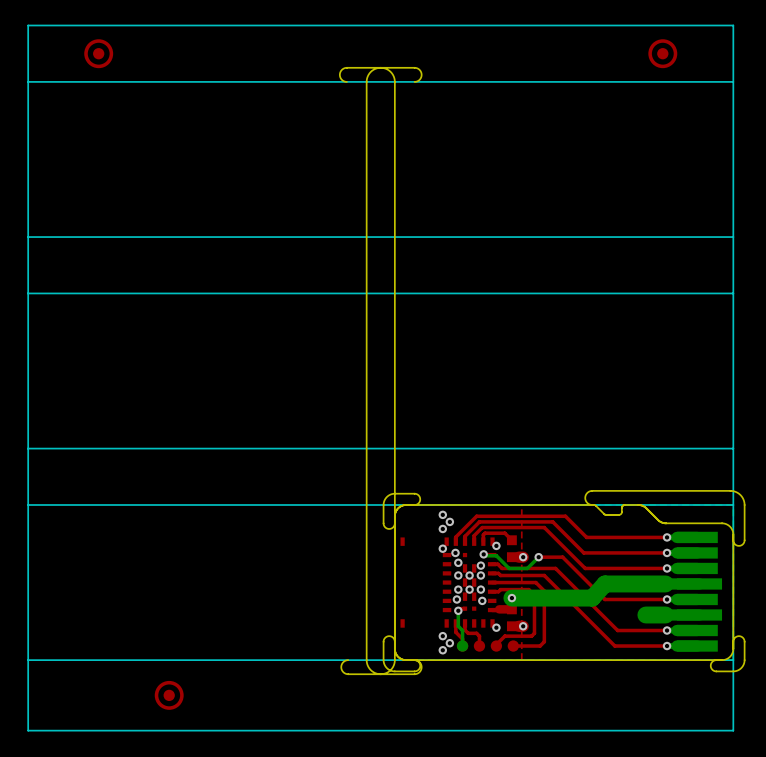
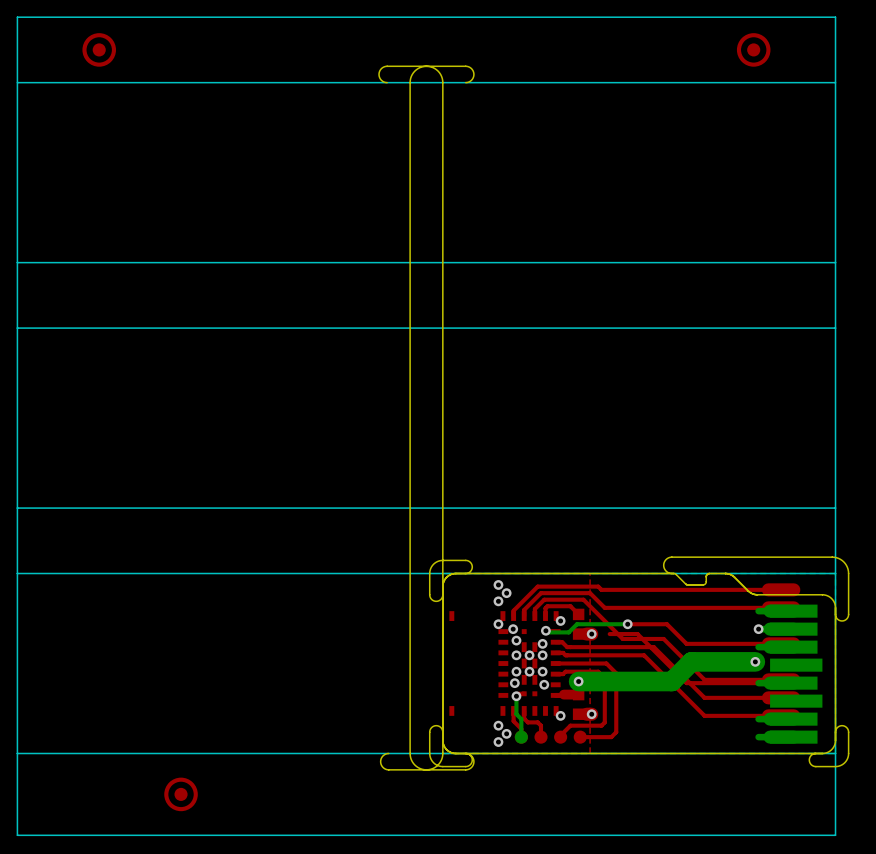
top track: (528, 516) (565, 516) (586, 537) (667, 537) -> (598, 586) (601, 589) (793, 589)
top track: (521, 521) (552, 521) (583, 552) (667, 552) -> (590, 593) (604, 607) (793, 607)
top track: (516, 527) (544, 527) (585, 568) (667, 568) -> (583, 599) (622, 638) (663, 638) (704, 679) (793, 679)
via: (667, 537) -> none
top track: none -> (627, 624) (666, 624) (686, 643) (793, 643)
bottom track: (496, 555) (509, 568) (527, 568) (538, 557) -> (560, 632) (568, 632) (576, 624) (627, 624)
via position: (538, 557) -> (627, 624)
top track: (555, 568) (617, 630) (667, 630) -> (629, 647) (653, 647) (704, 697) (793, 697)
via: (667, 568) -> none
top track: (544, 575) (614, 646) (667, 646) -> (616, 655) (644, 655) (704, 715) (793, 715)
via: none -> (755, 661)
bottom track: (699, 583) (604, 583) (592, 598) -> (755, 661) (691, 661) (671, 681)
via: (667, 599) -> none
bottom track: (699, 614) (645, 614) -> none
via: (667, 630) -> none
via: (667, 646) -> none

